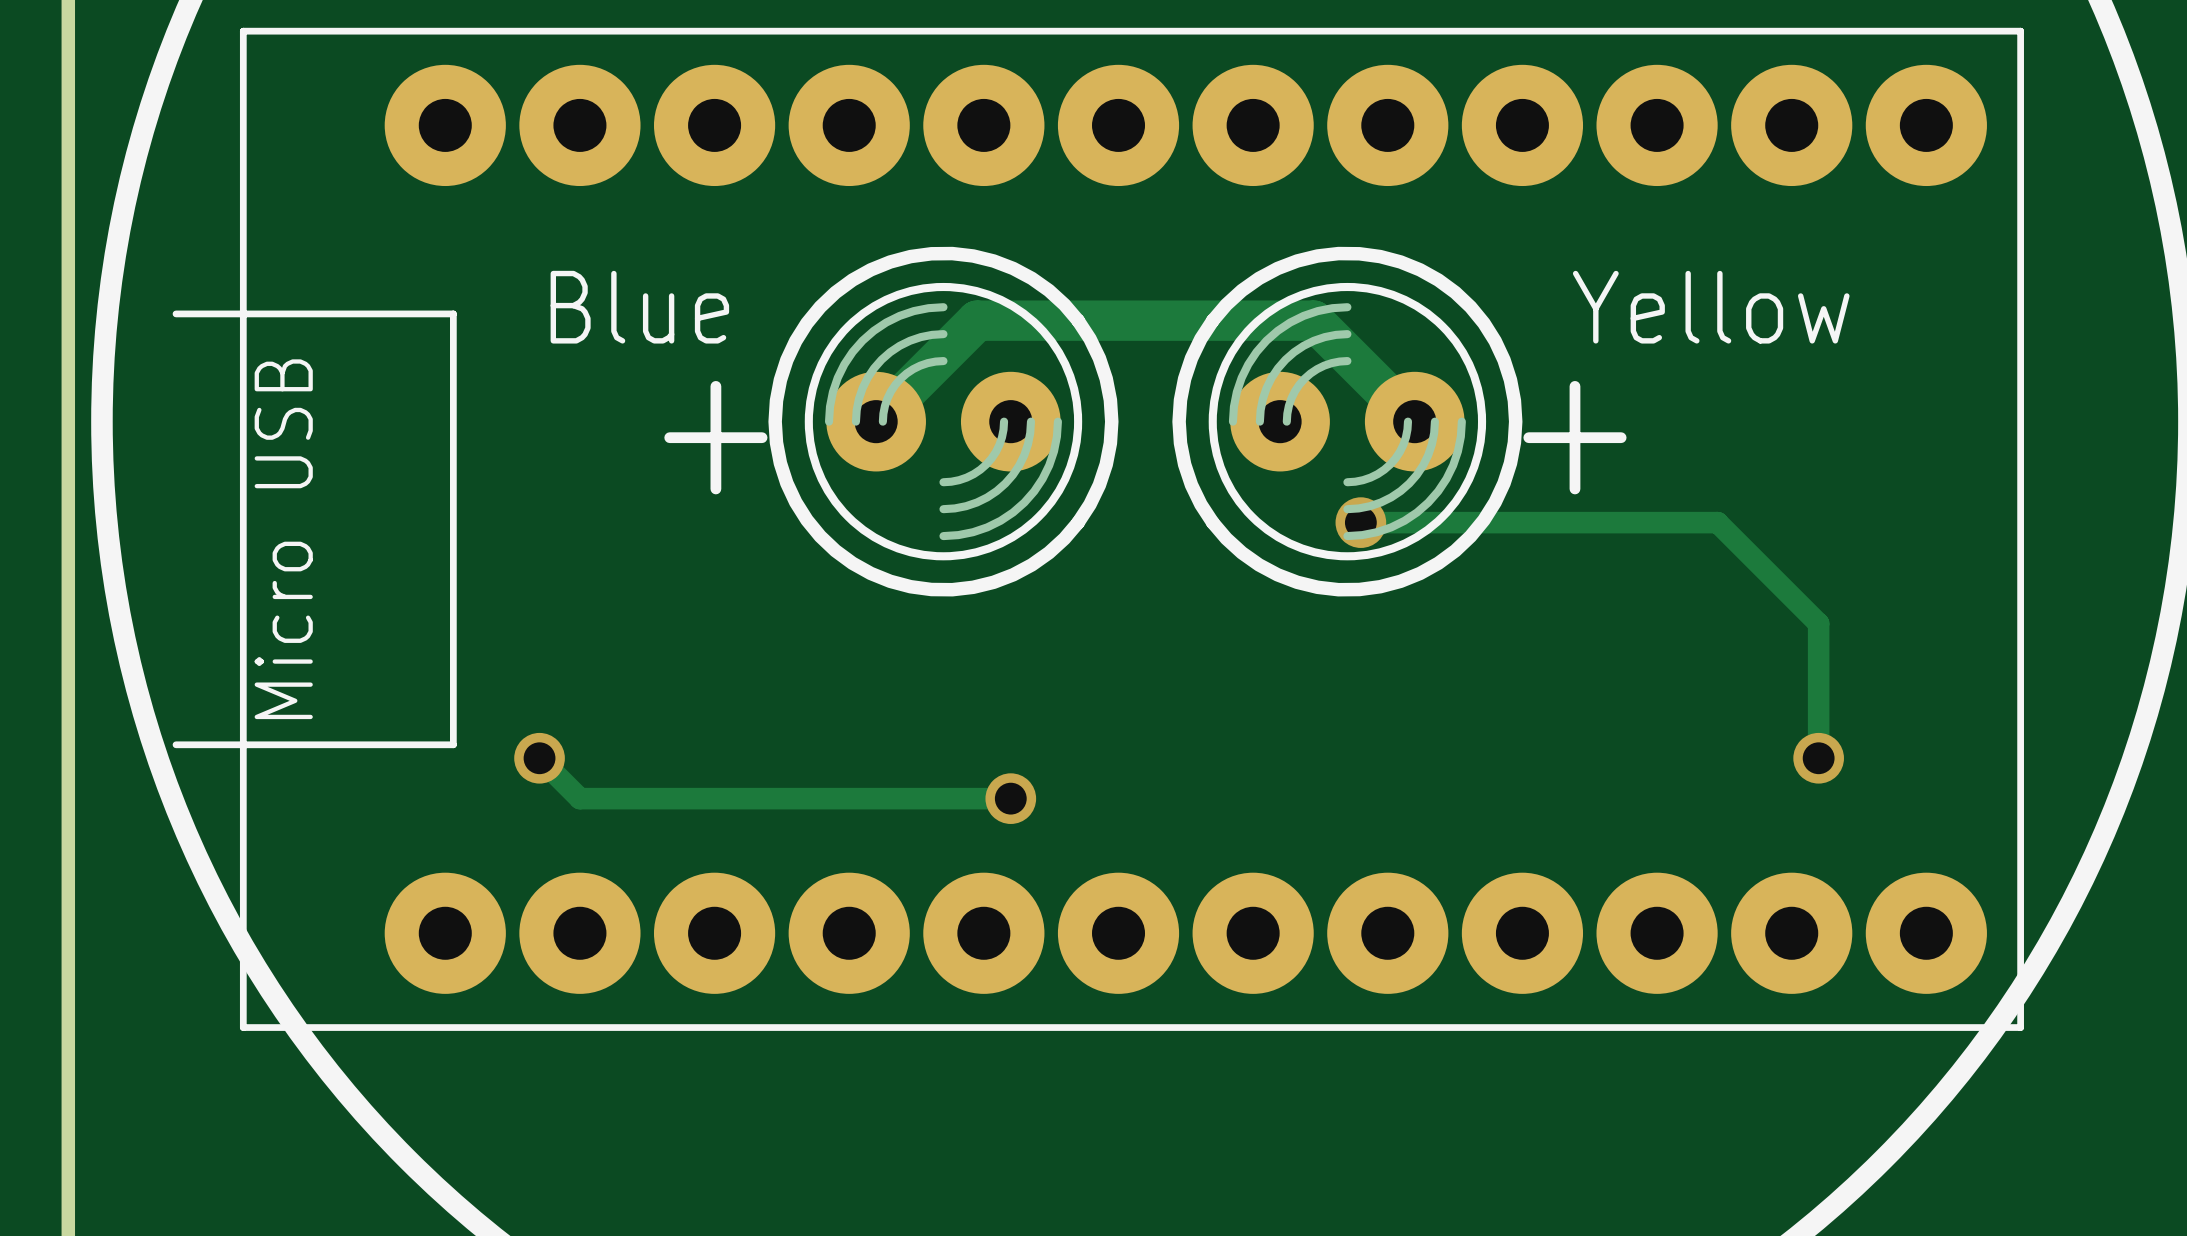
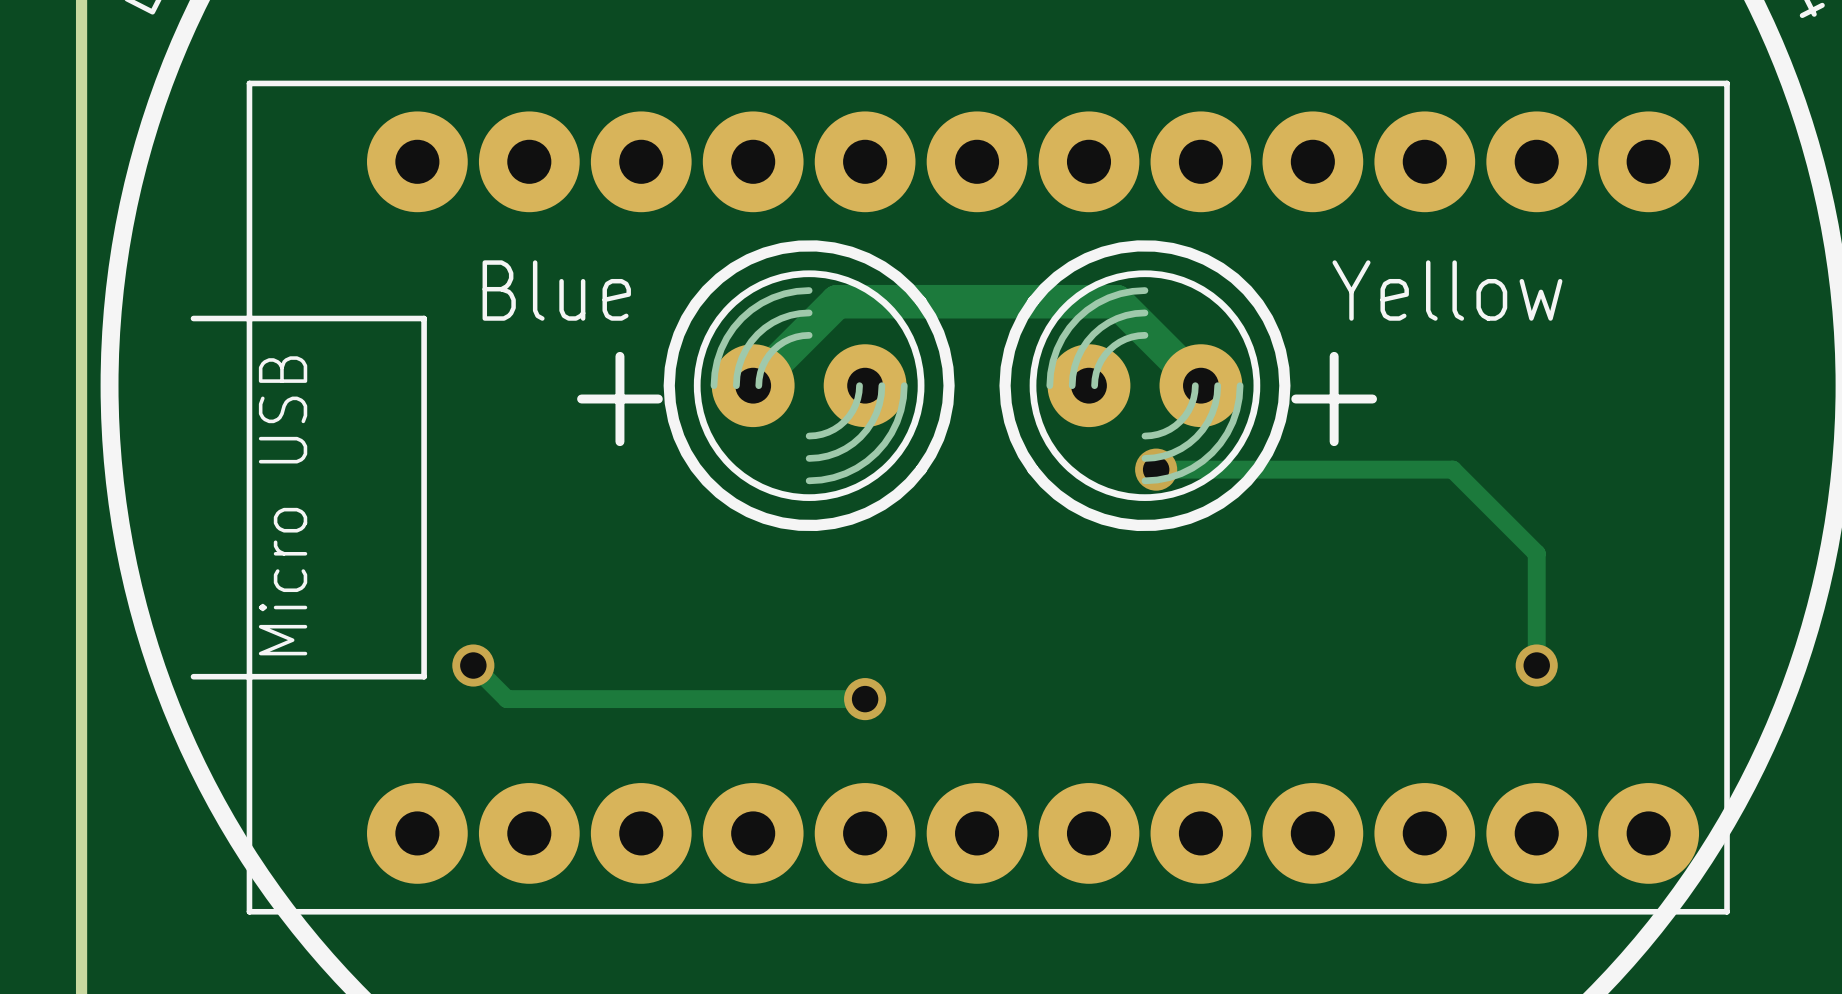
part position: (1098, 529) -> (960, 497)

